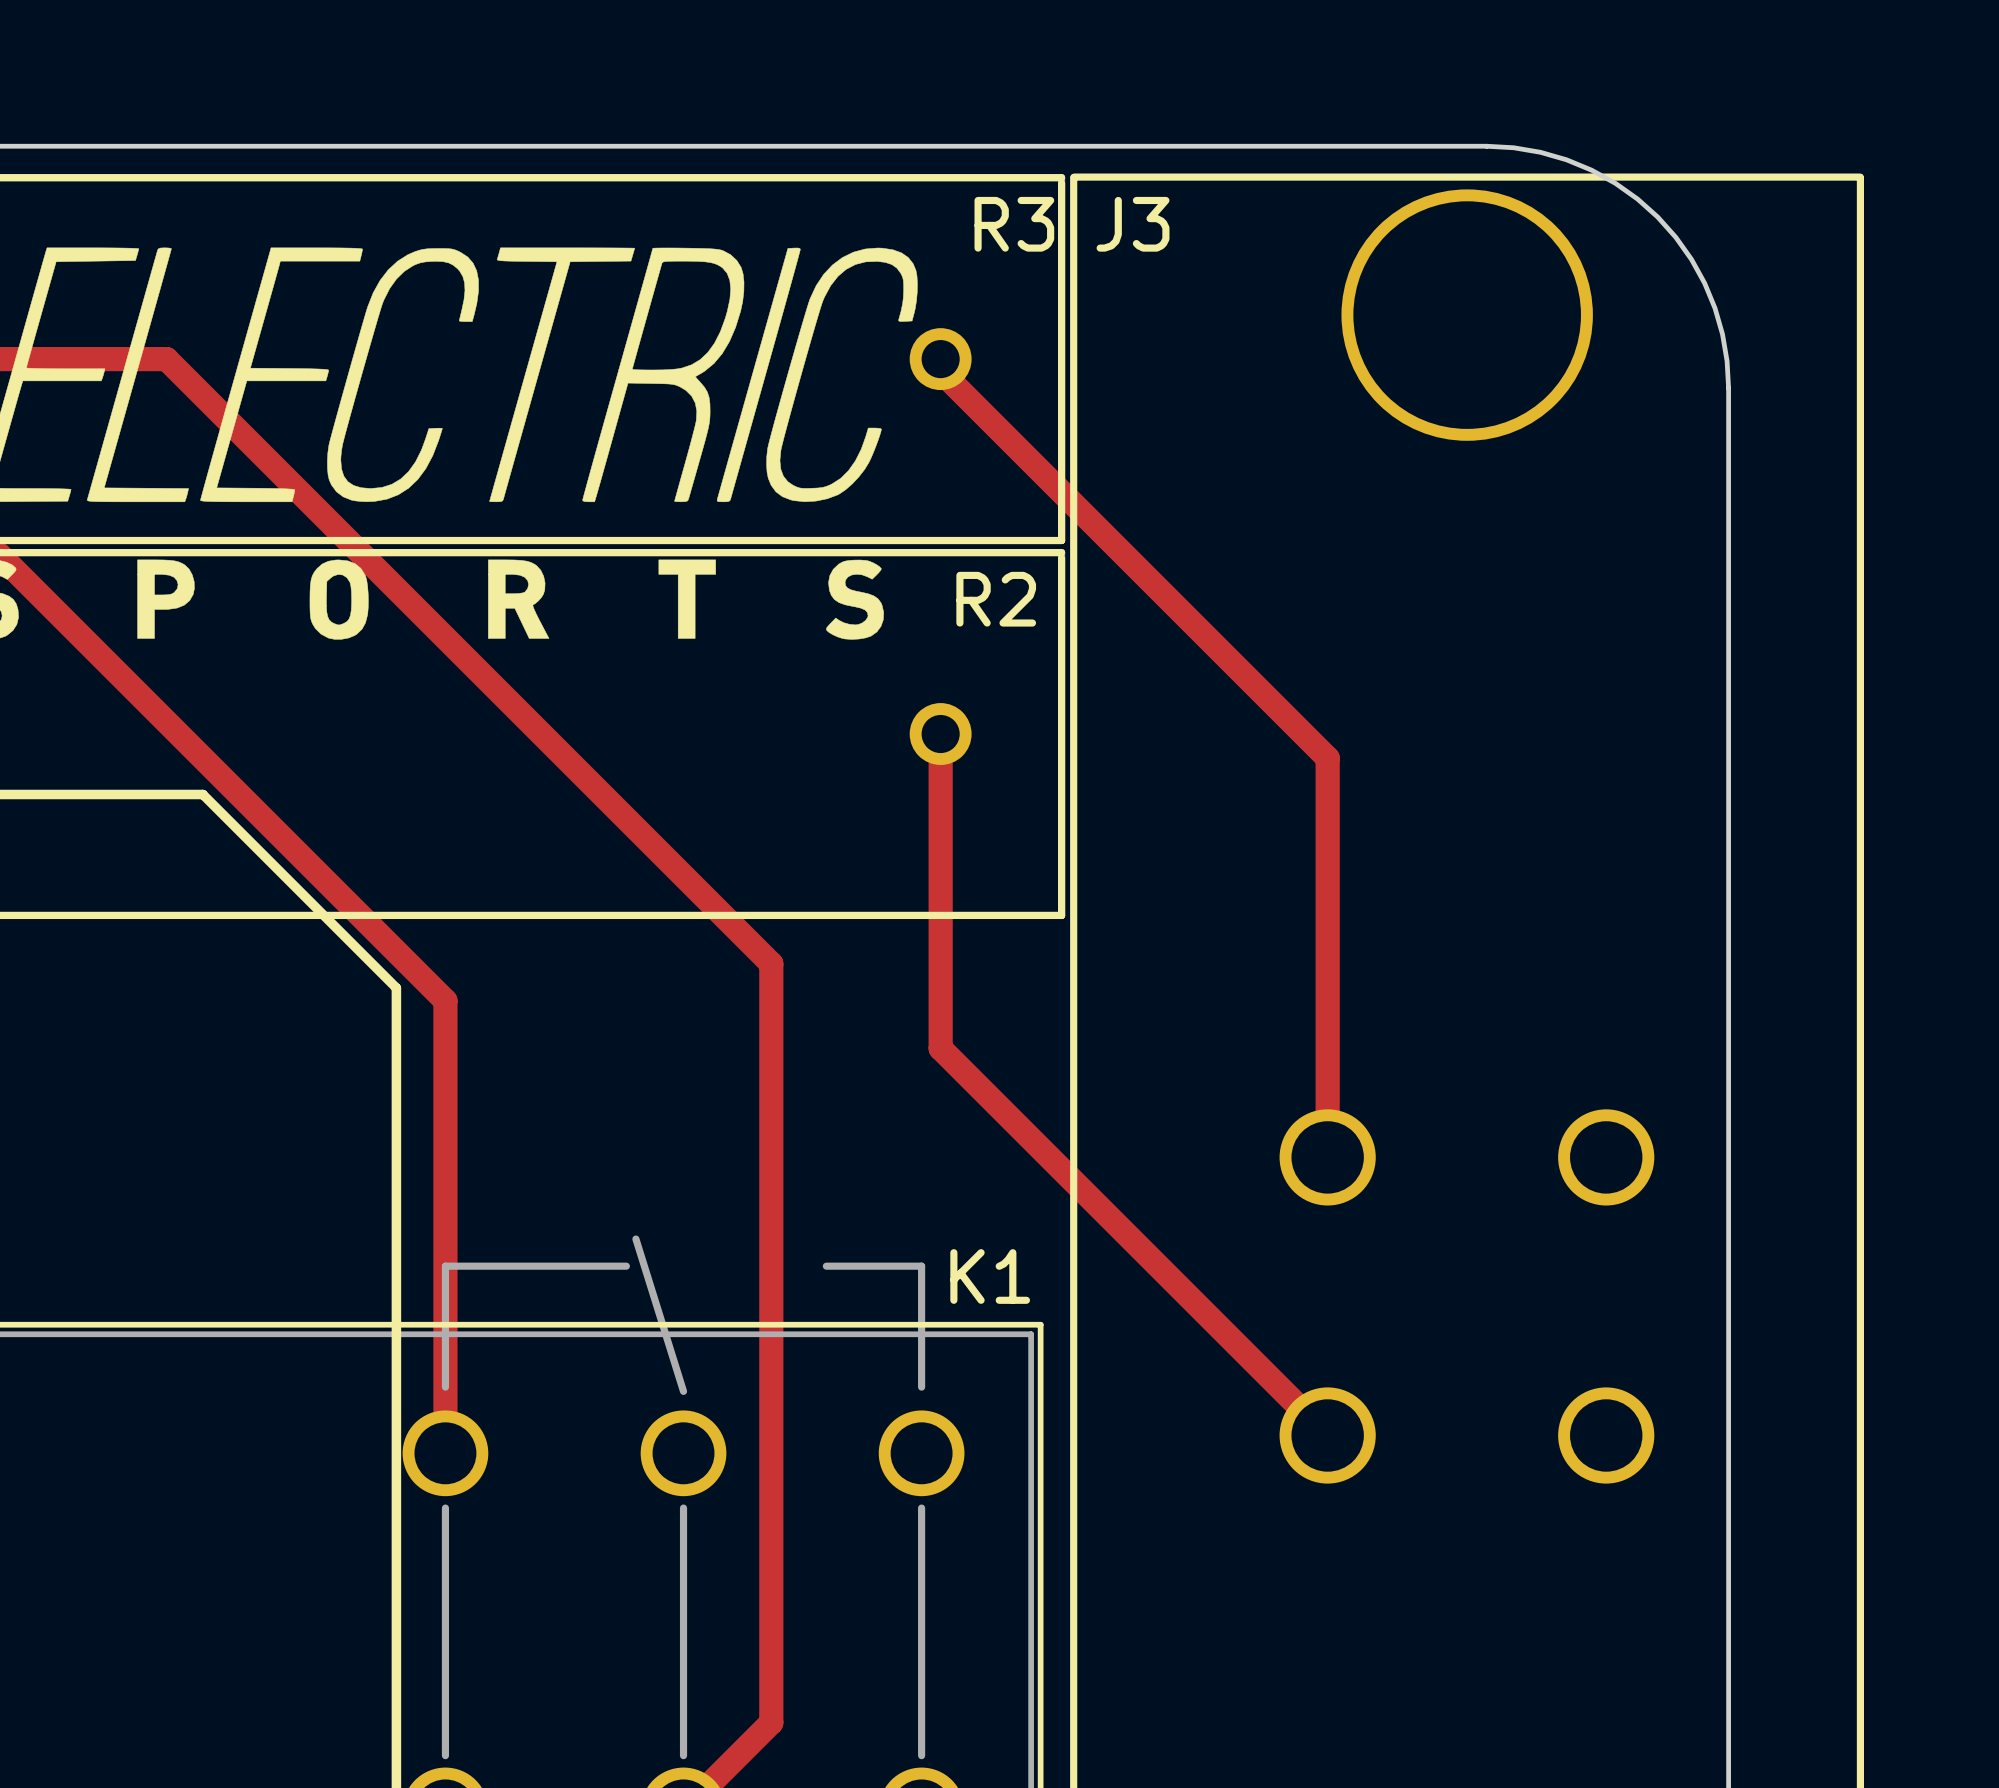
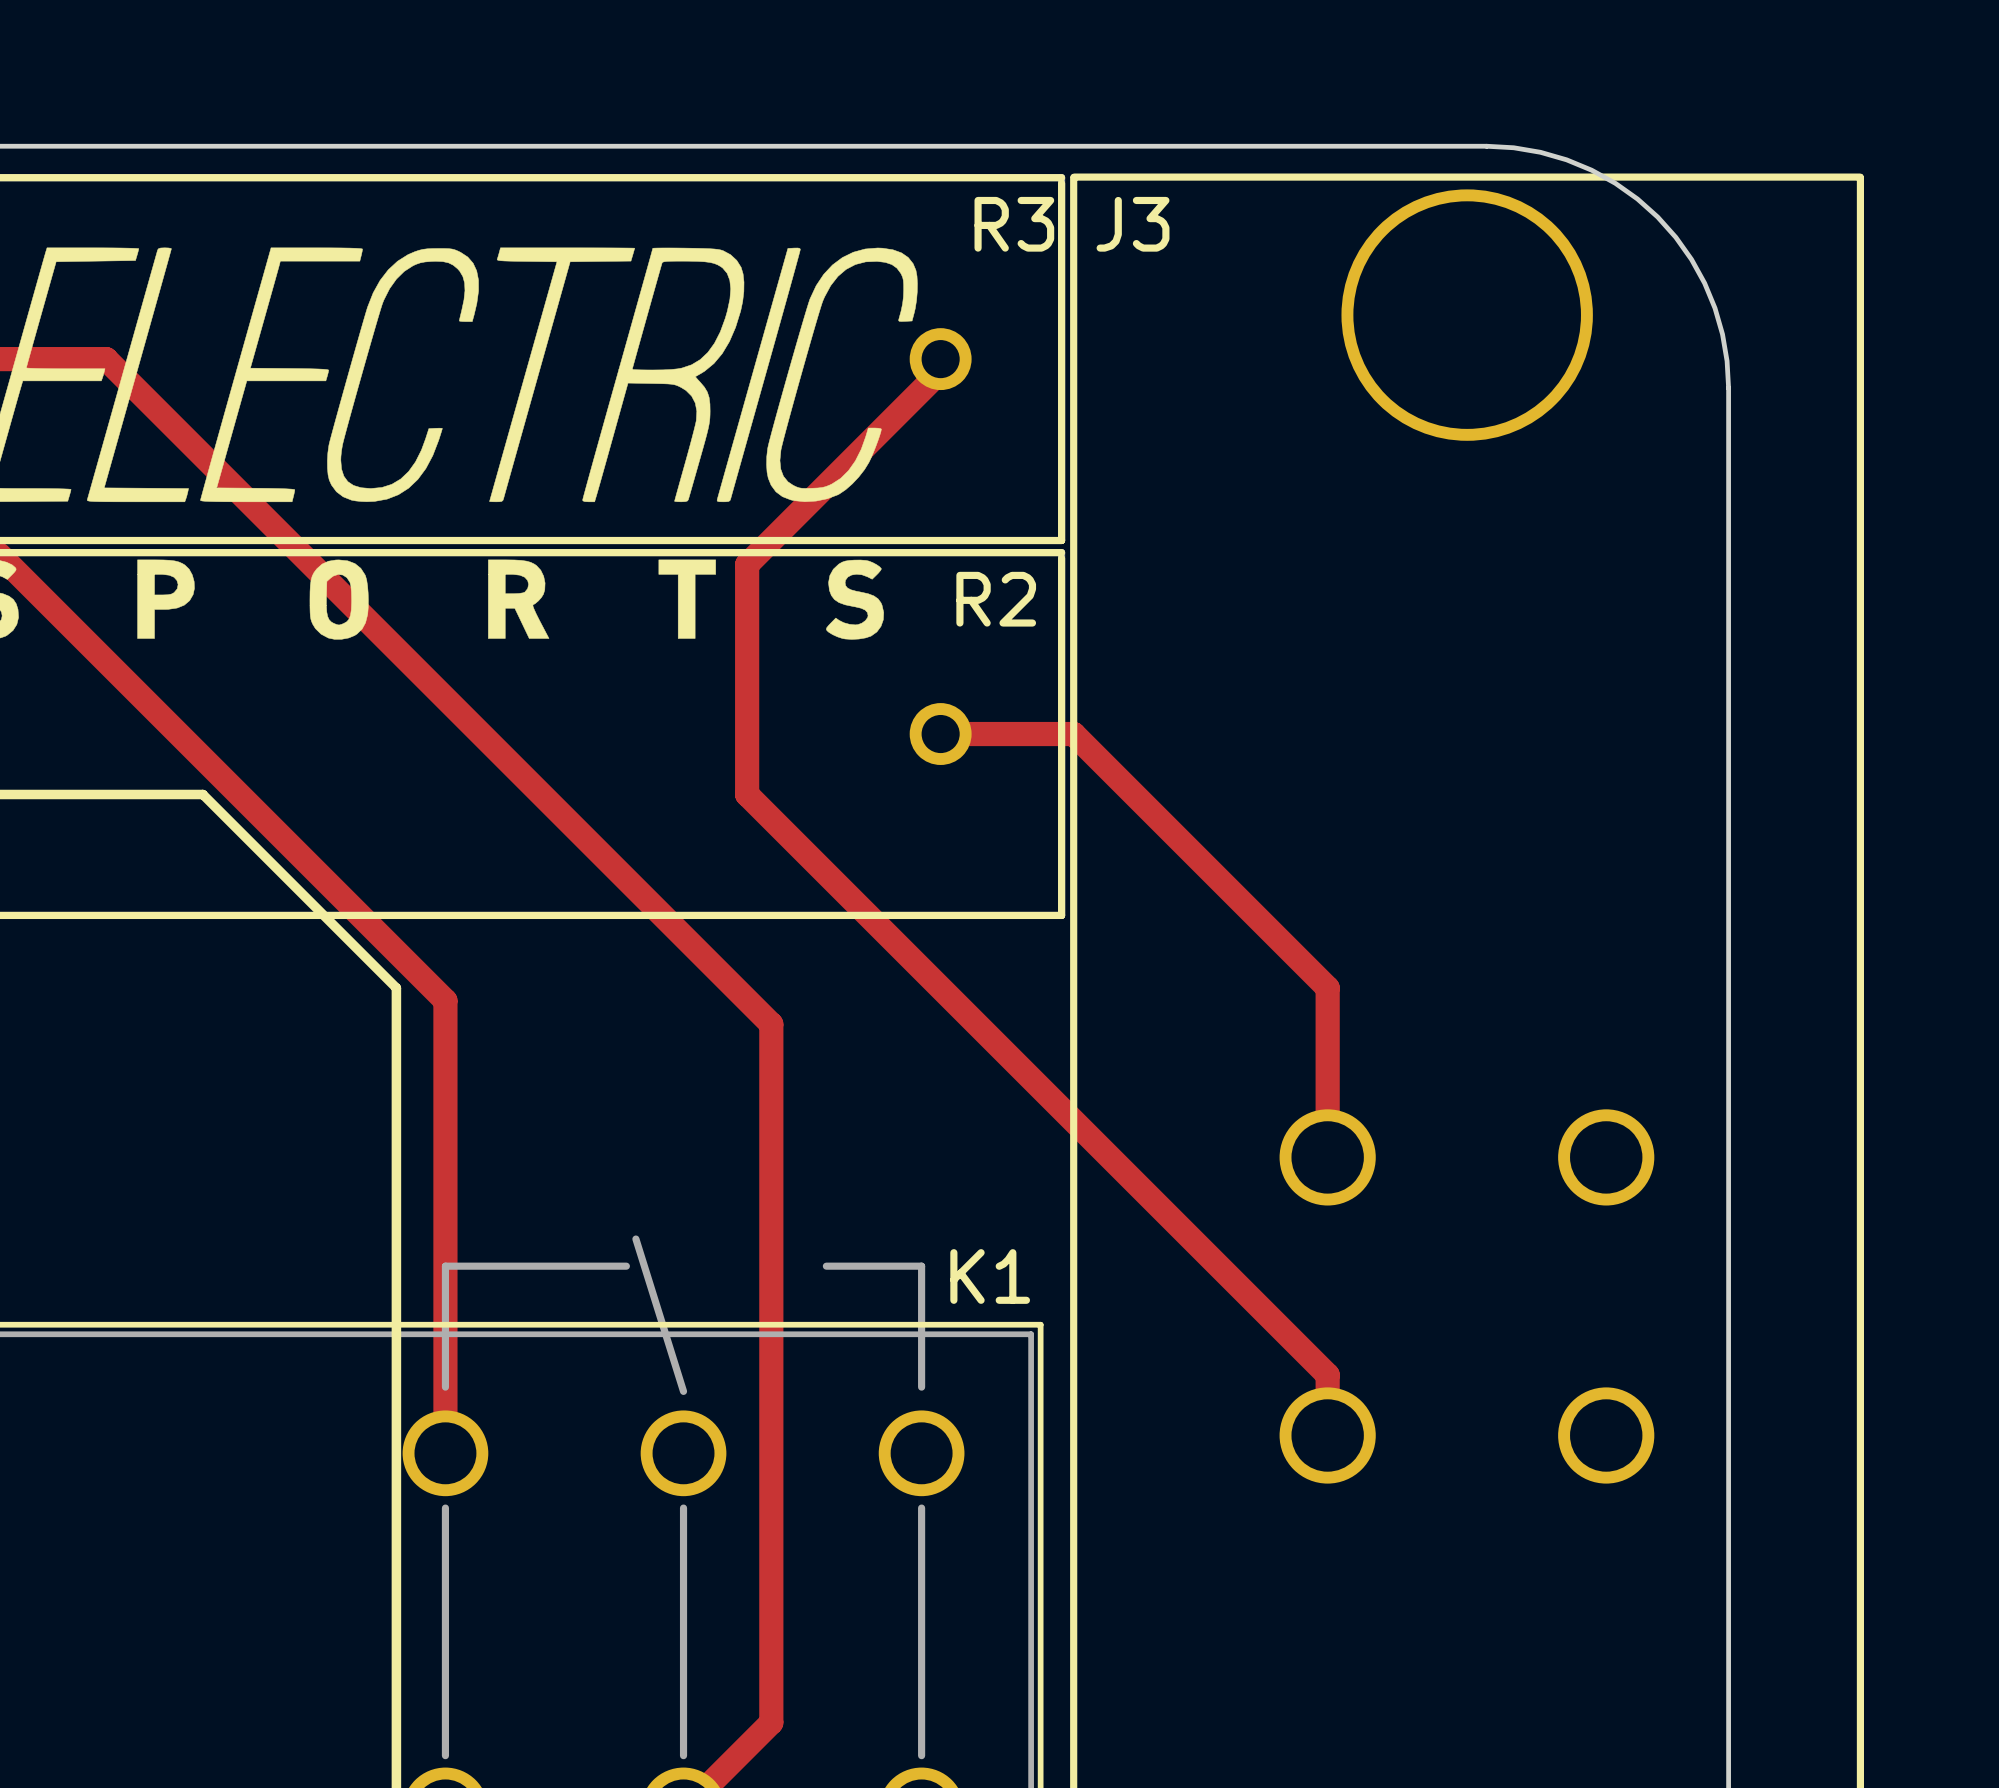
track: (106, 359) (166, 359) (771, 963) (771, 1024) -> (106, 359) (771, 1024)
track: (940, 371) (1327, 758) (1327, 988) -> (940, 734) (1073, 734) (1327, 988)
track: (940, 734) (940, 1048) (1327, 1435) -> (940, 371) (747, 564) (747, 794) (1327, 1375) (1327, 1435)

